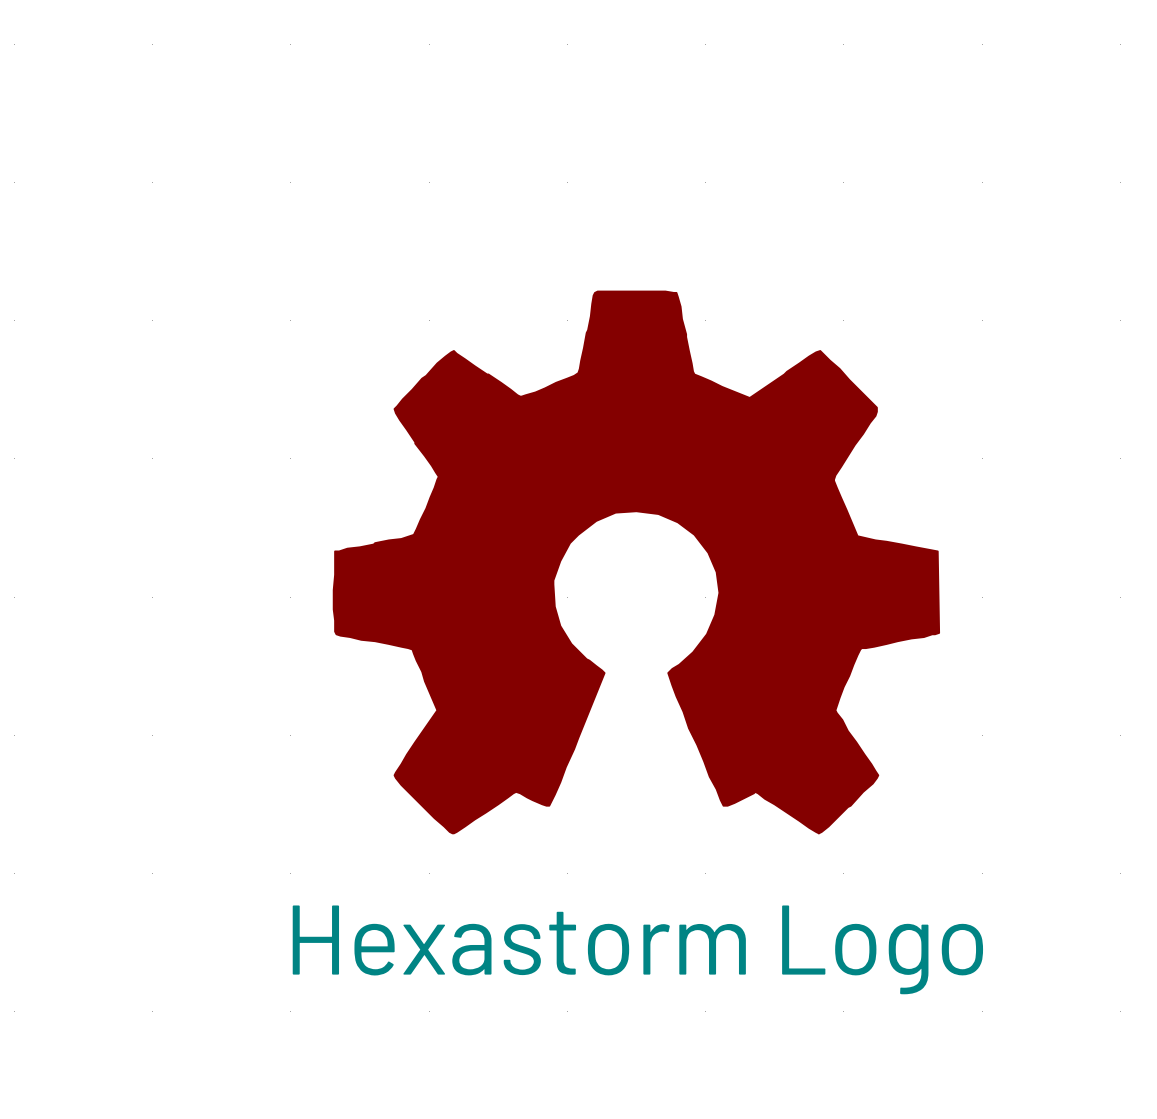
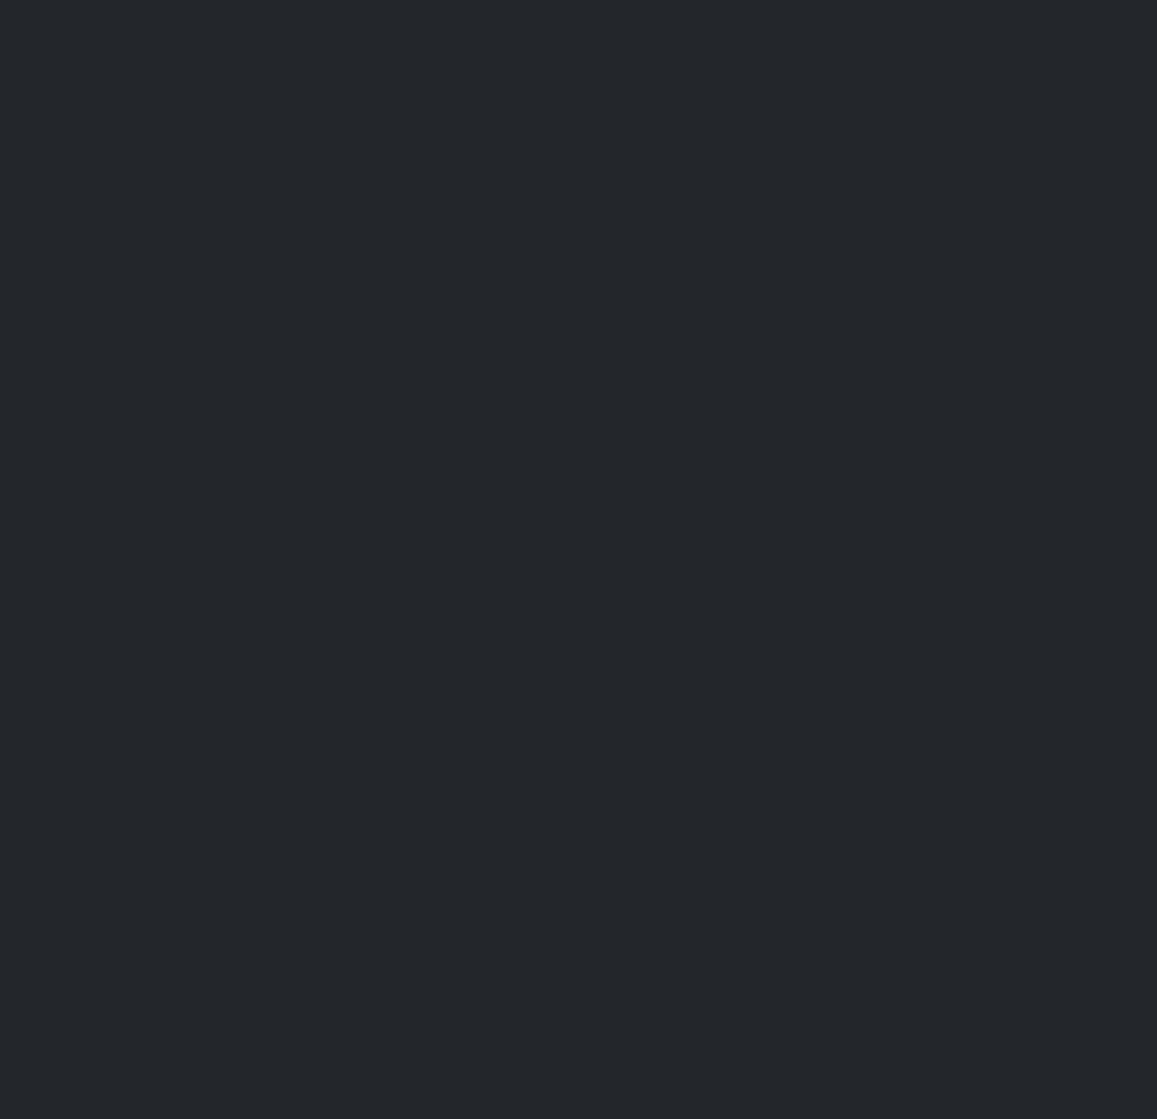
part: (636, 562) -> none

